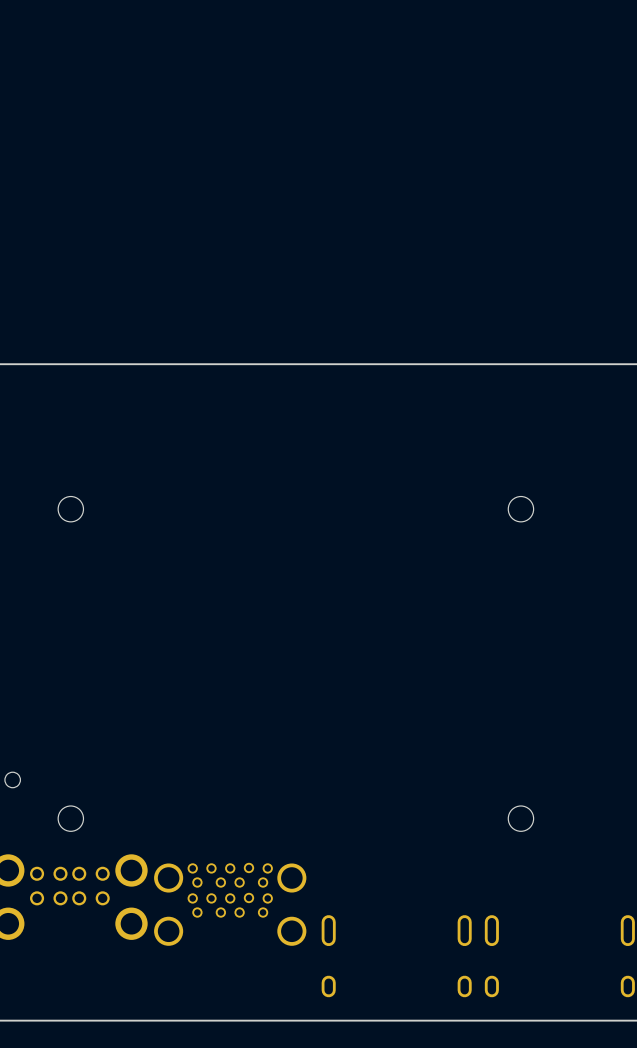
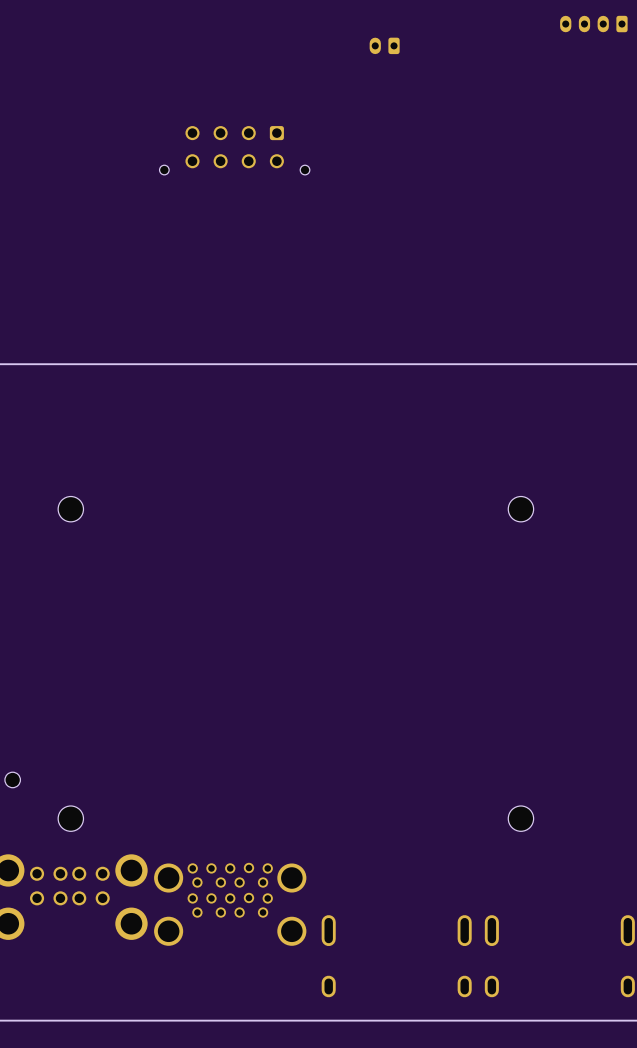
part: none -> (593, 24)
part: none -> (384, 45)
part: none -> (234, 150)

